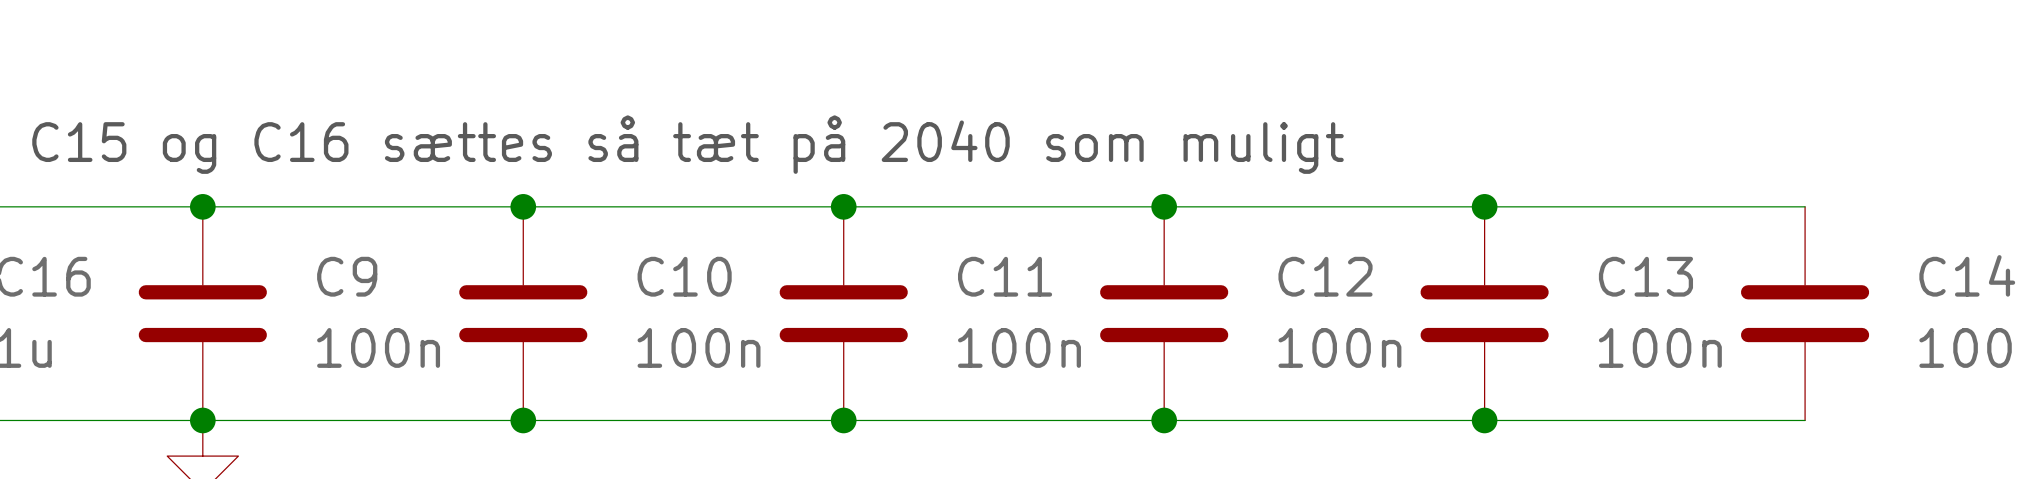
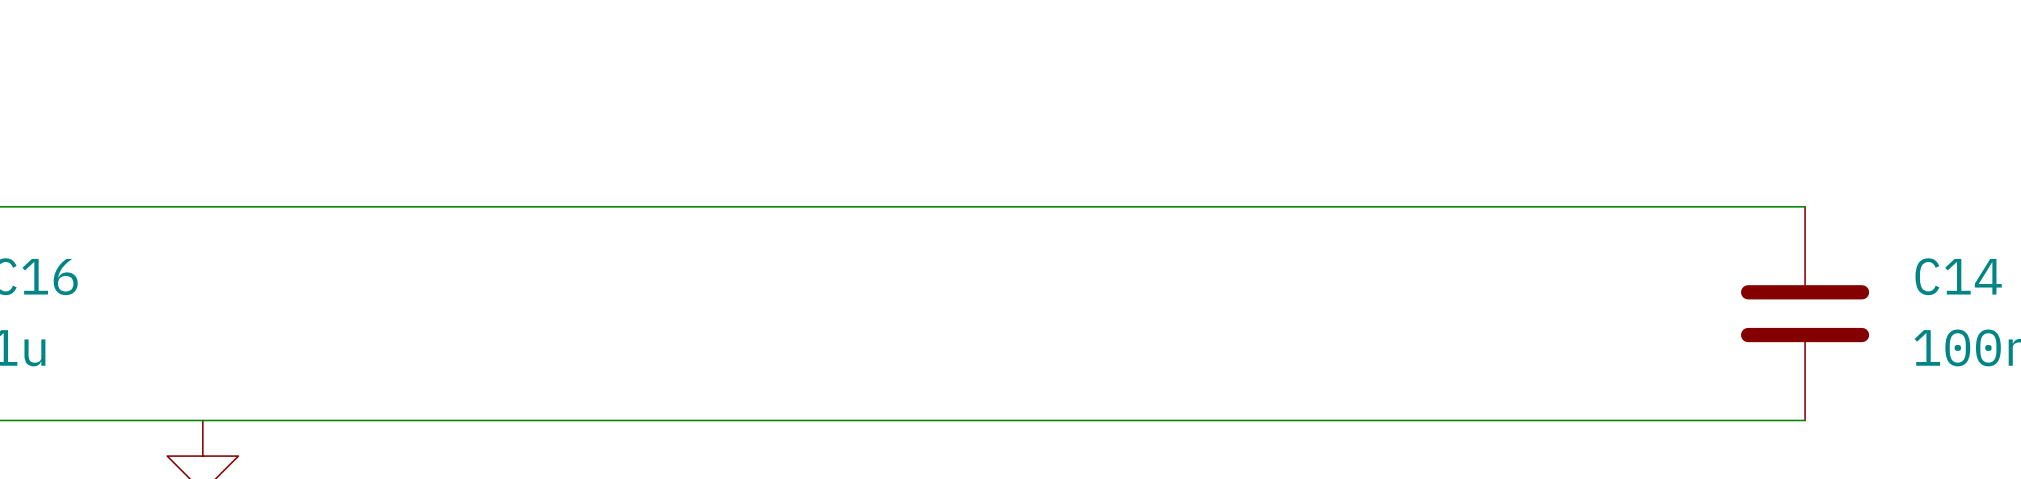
text: C15 og C16 sættes så tæt på 2040 som muligt (688, 144) -> none
junction: (202, 206) -> none
junction: (523, 206) -> none
junction: (843, 206) -> none
junction: (1164, 206) -> none
junction: (1484, 206) -> none
C9: 100n (202, 313) -> none
C10: 100n (523, 313) -> none
C11: 100n (843, 313) -> none
C12: 100n (1164, 313) -> none
C13: 100n (1484, 313) -> none
junction: (202, 420) -> none
junction: (523, 420) -> none
junction: (843, 420) -> none
junction: (1164, 420) -> none
junction: (1484, 420) -> none

